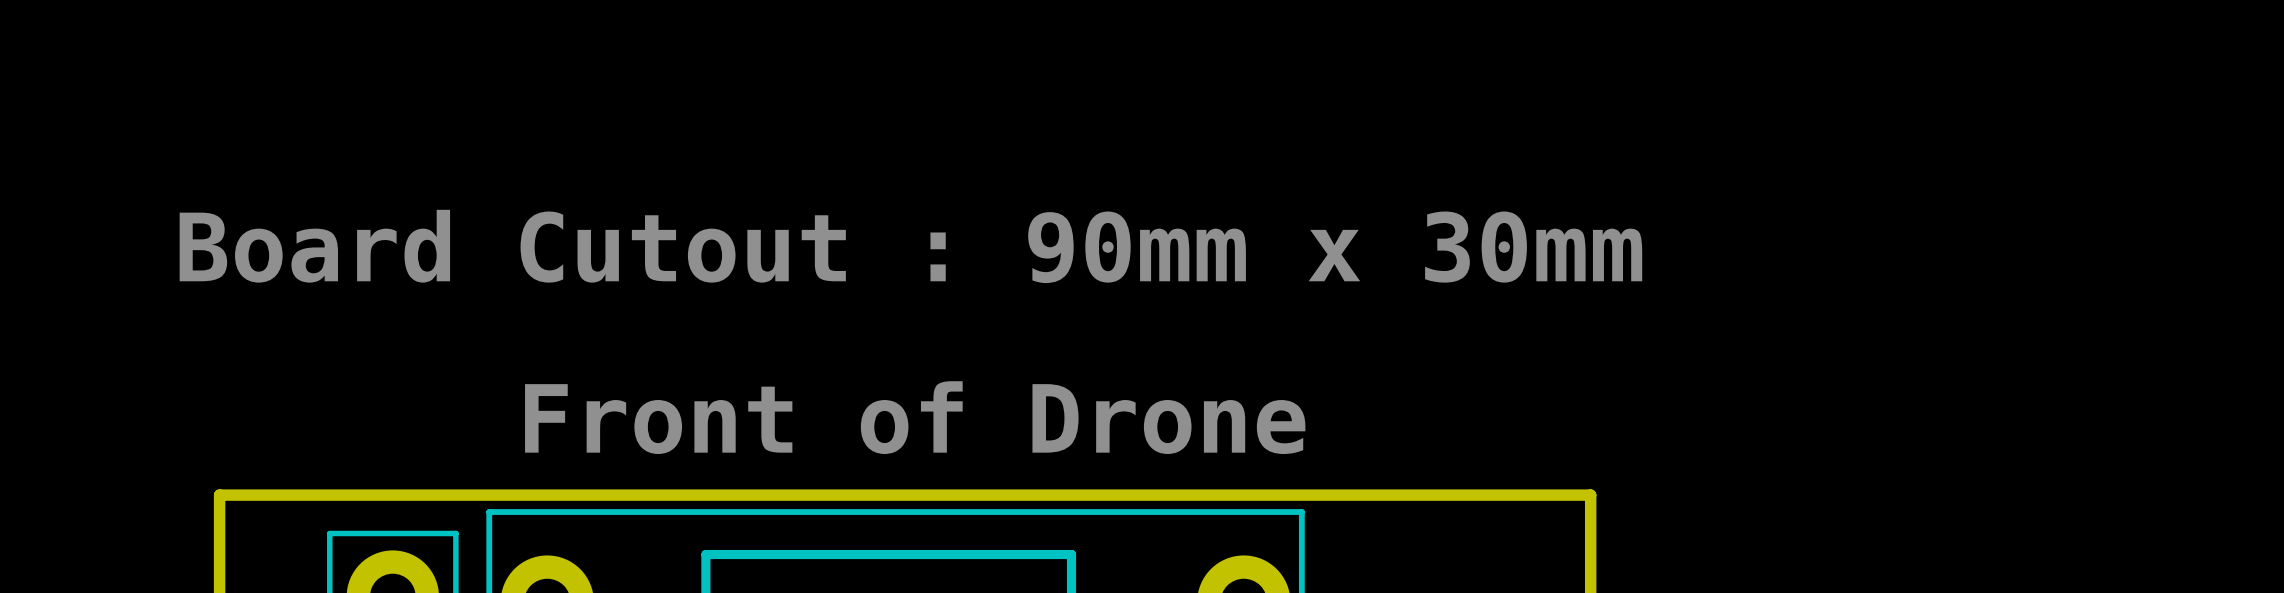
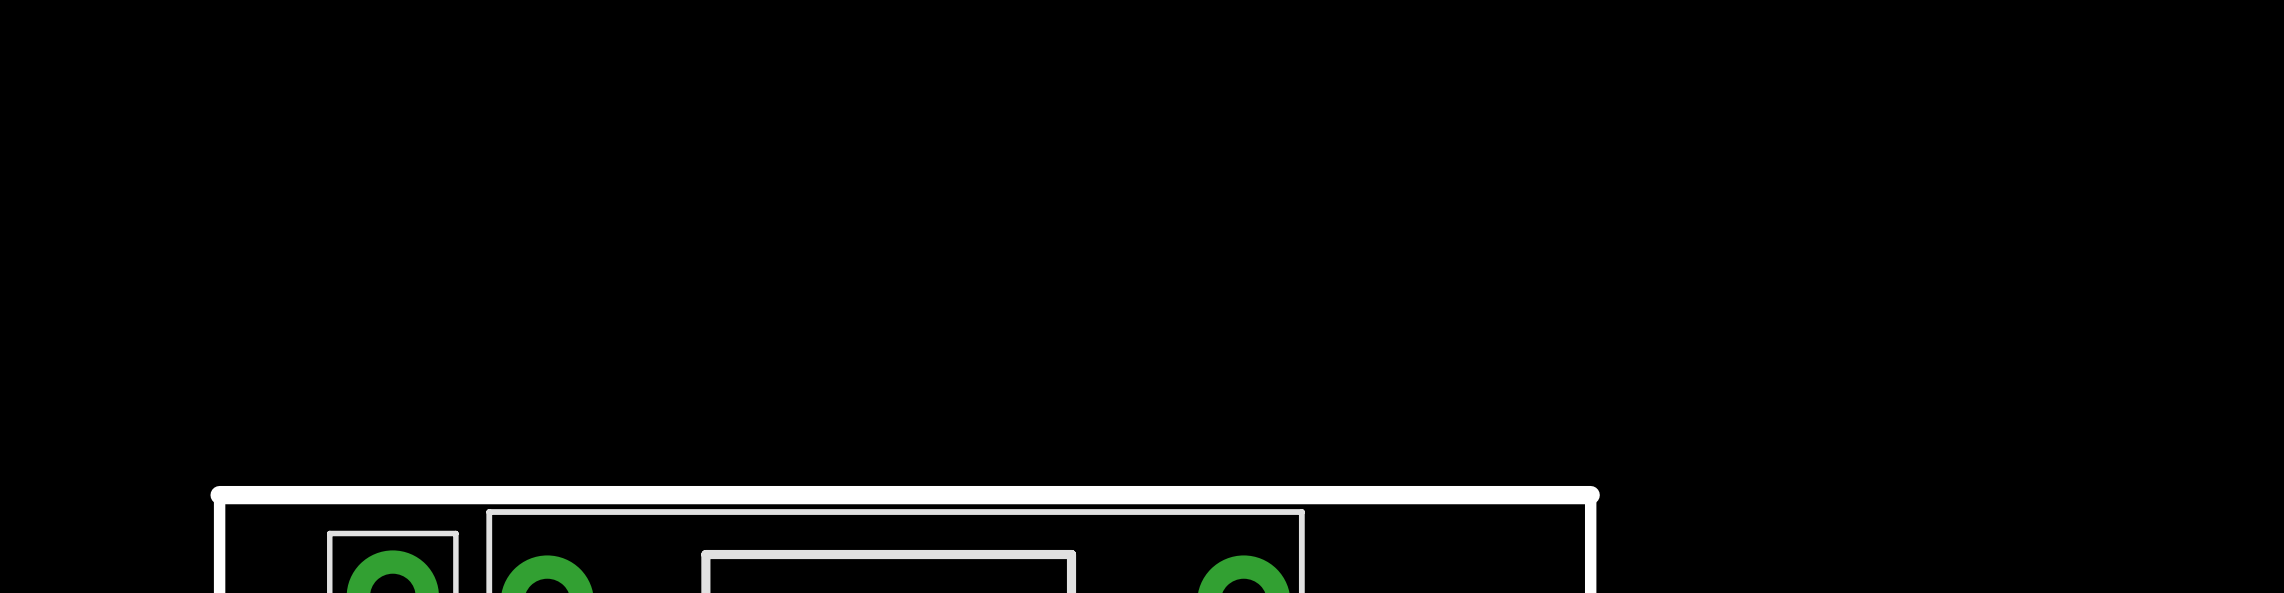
text: Board Cutout : 90mm x 30mm (910, 246) -> none
text: Front of Drone (915, 417) -> none
board edge width: thin (219, 495) (1590, 495) -> thick (219, 495) (1590, 495)

